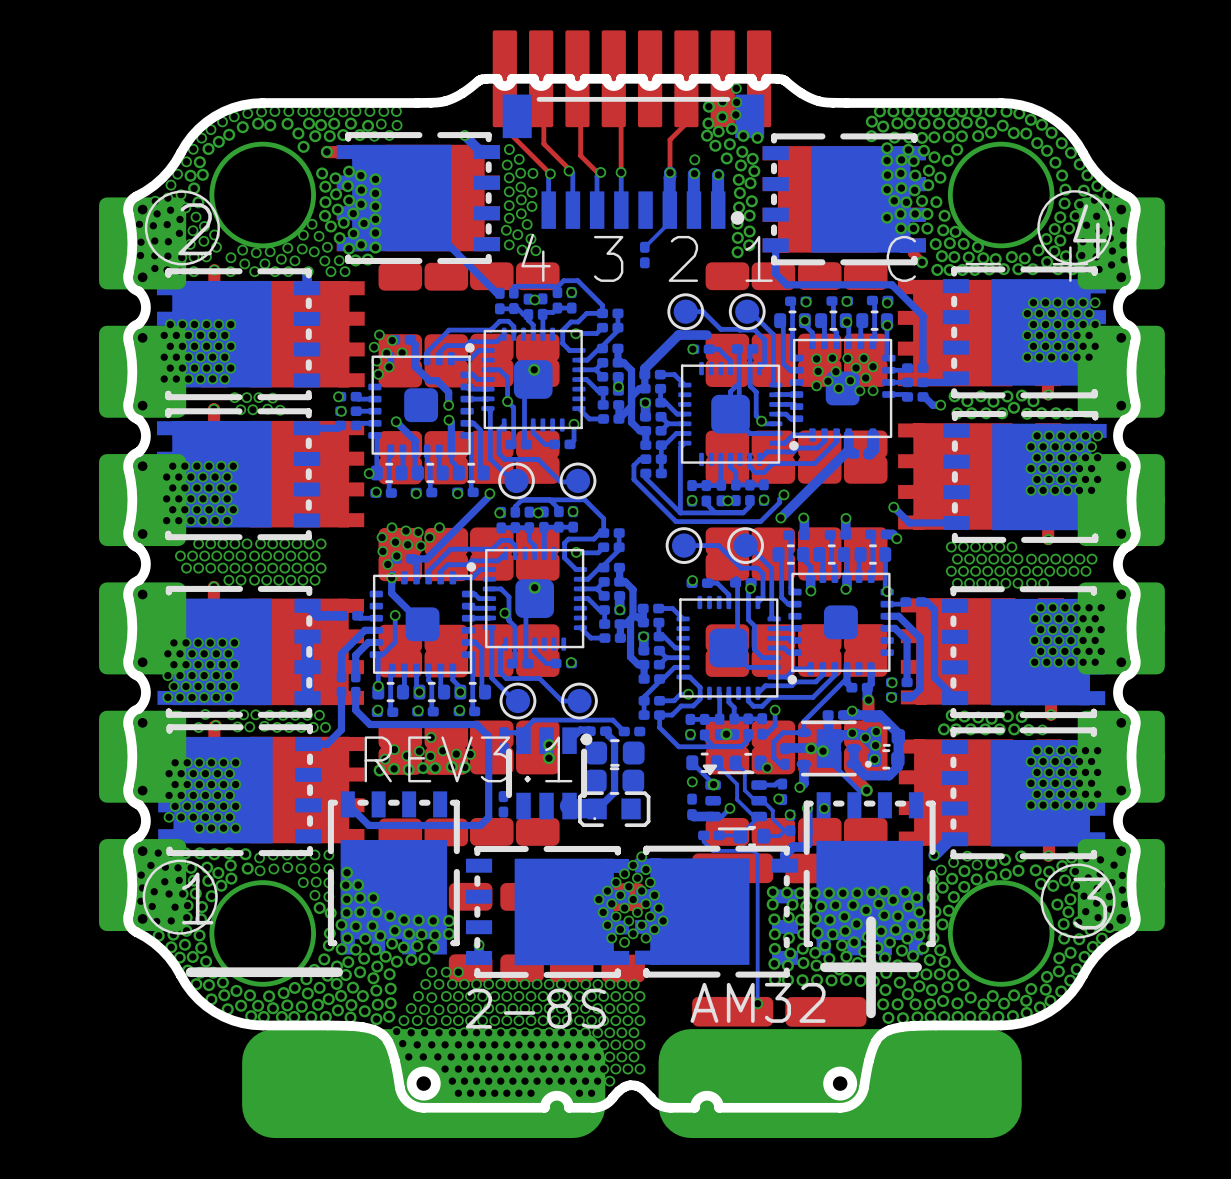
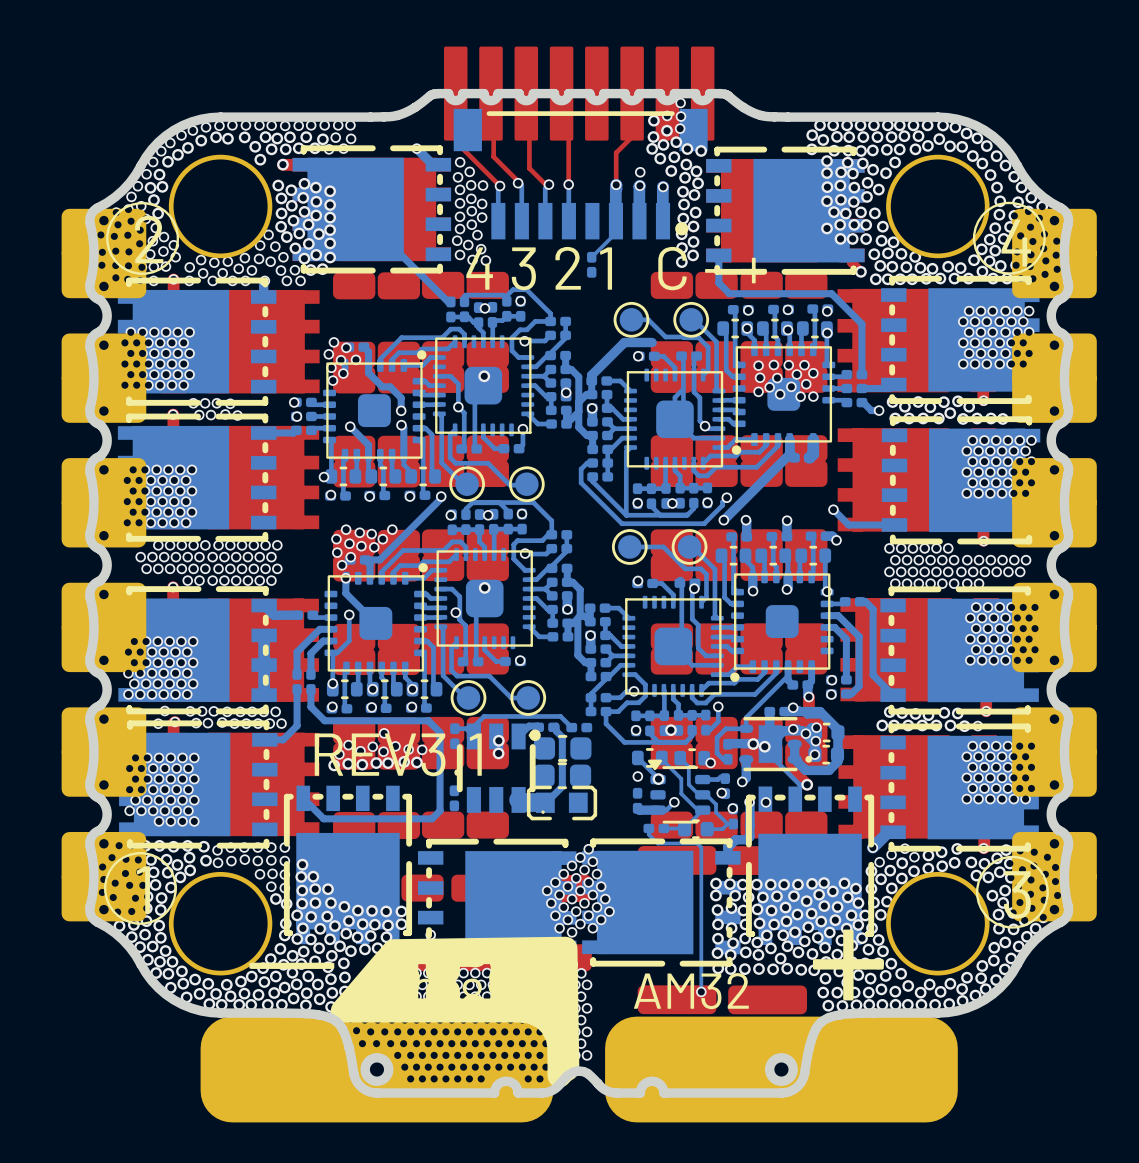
drawing: none -> [330, 936, 580, 1088]

